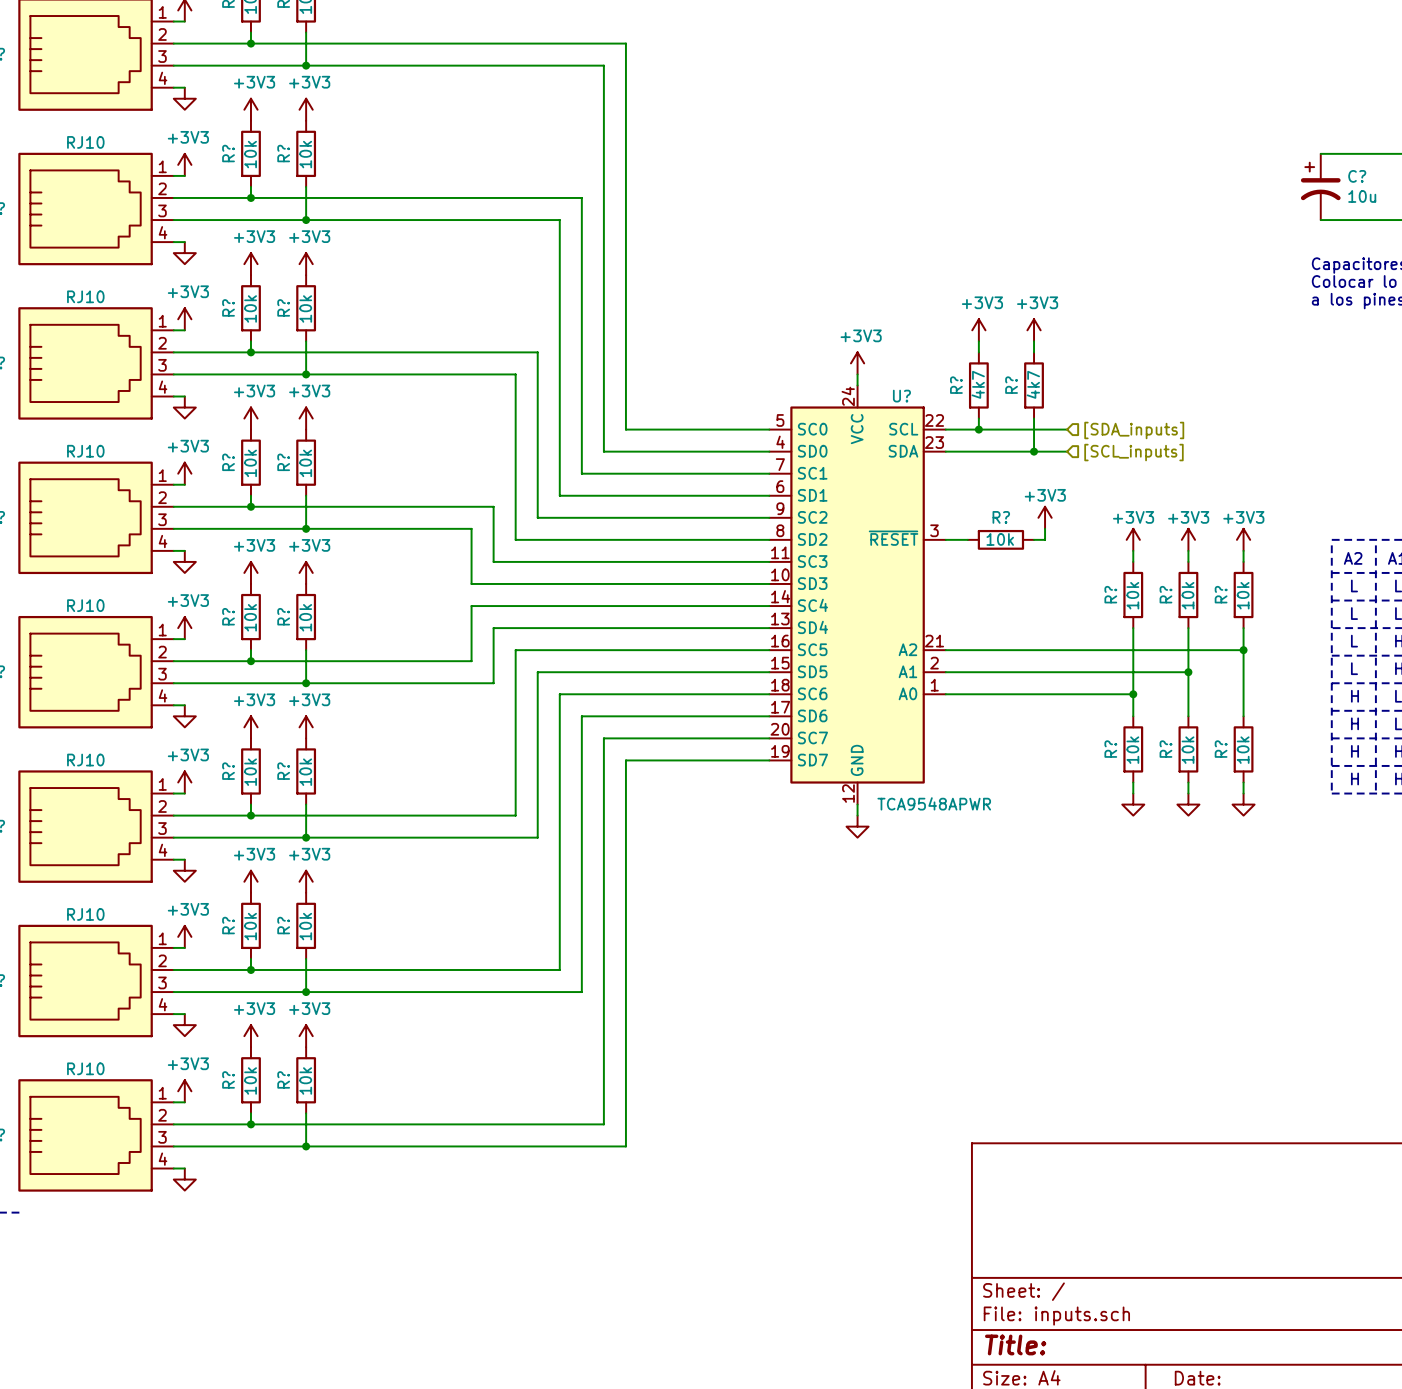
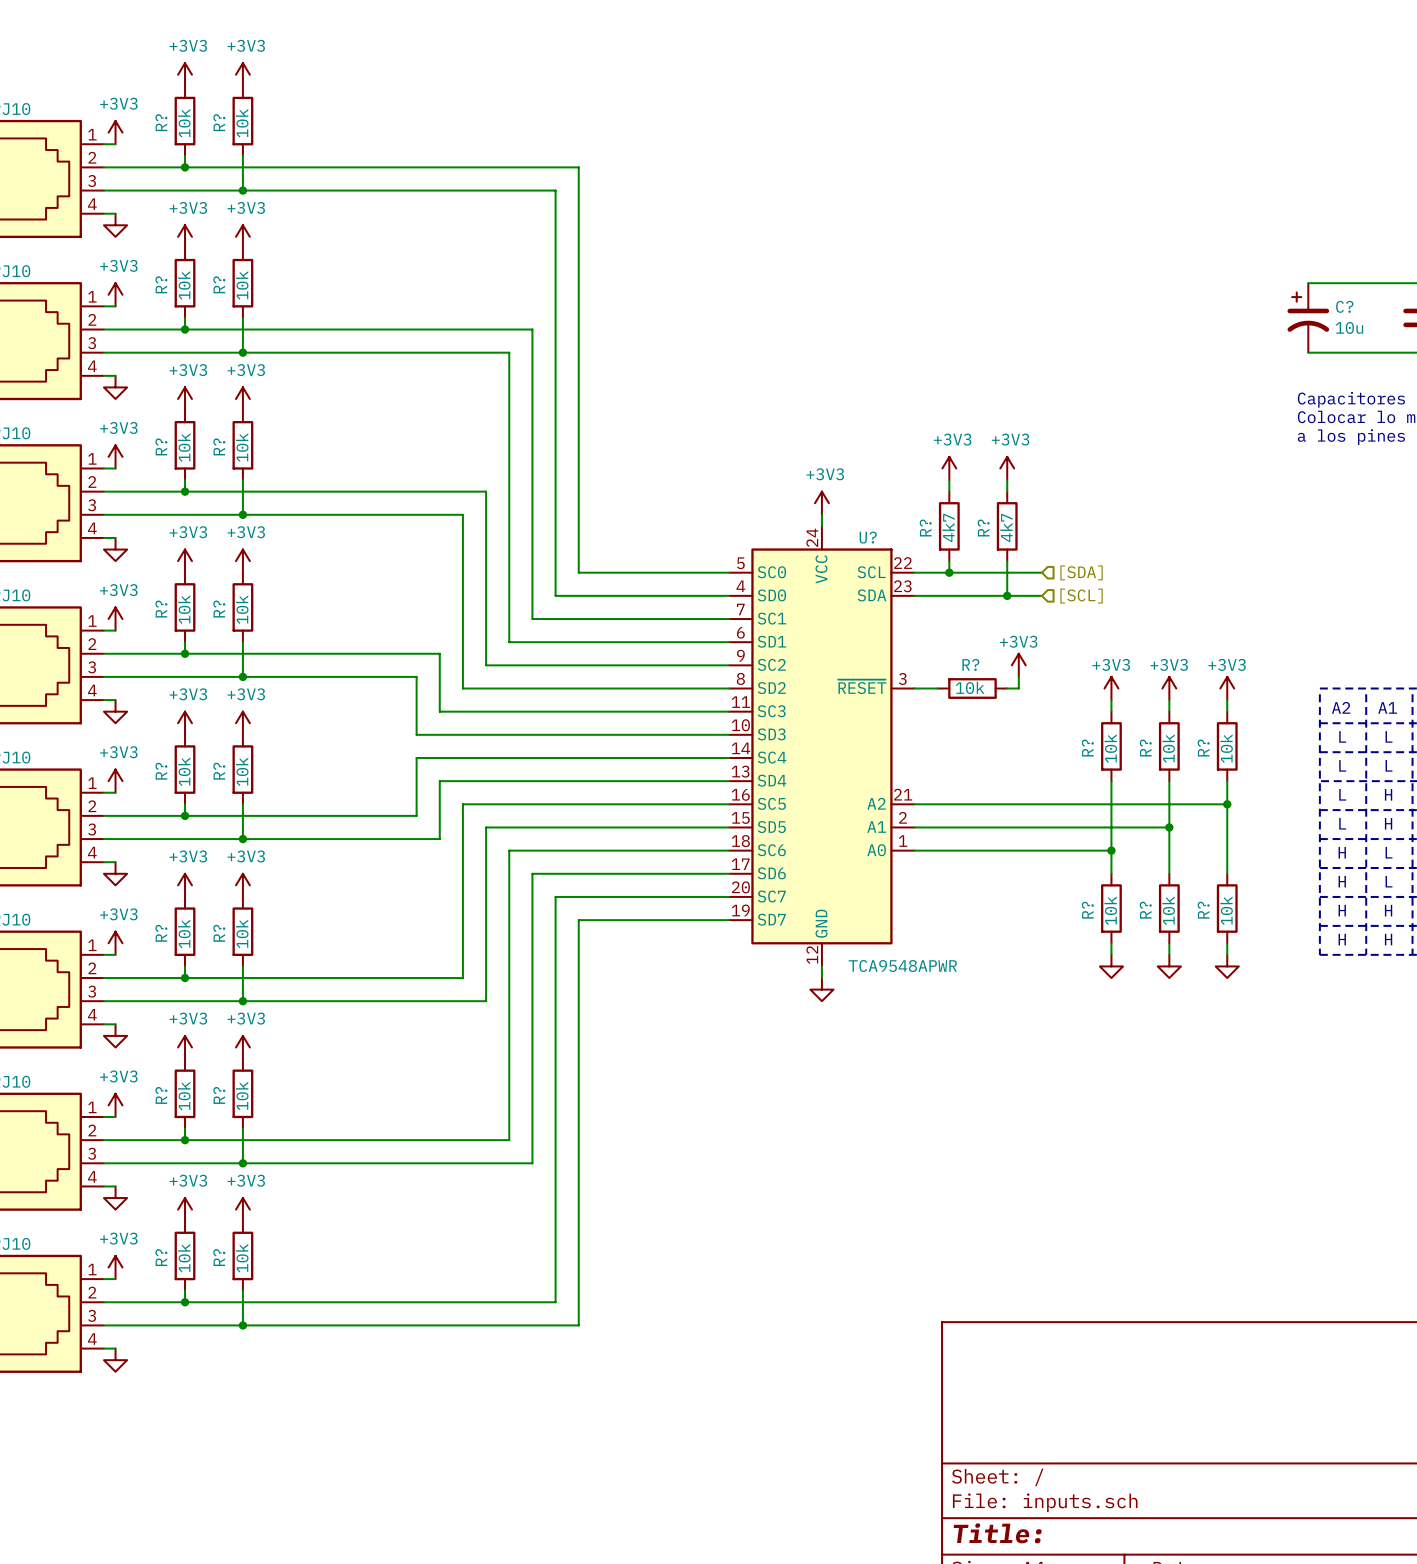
hierarchical label: [SDA_inputs] (1134, 430) -> [SDA] (1081, 572)
hierarchical label: [SCL_inputs] (1133, 452) -> [SCL] (1081, 596)

